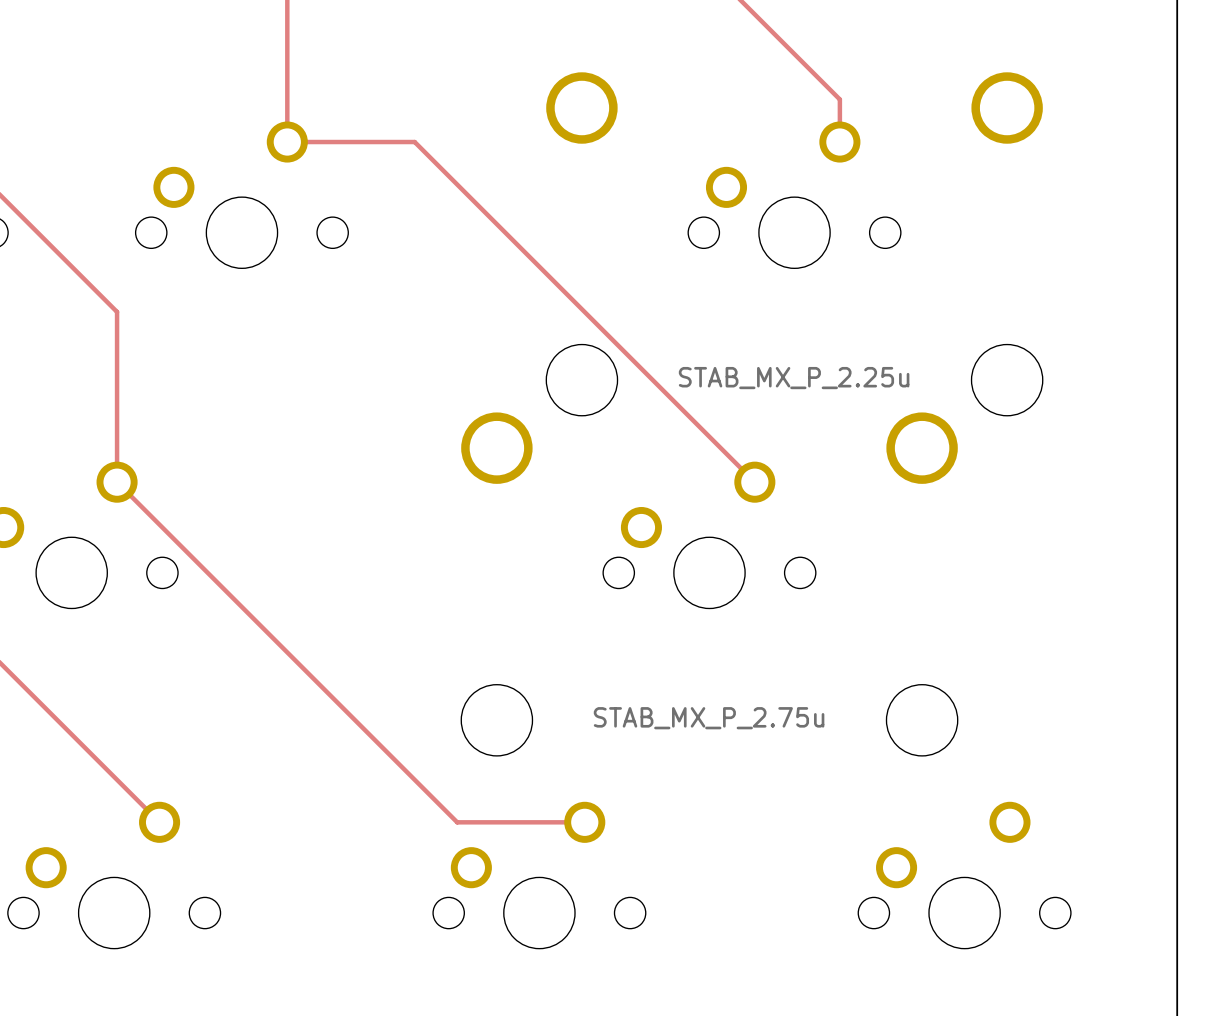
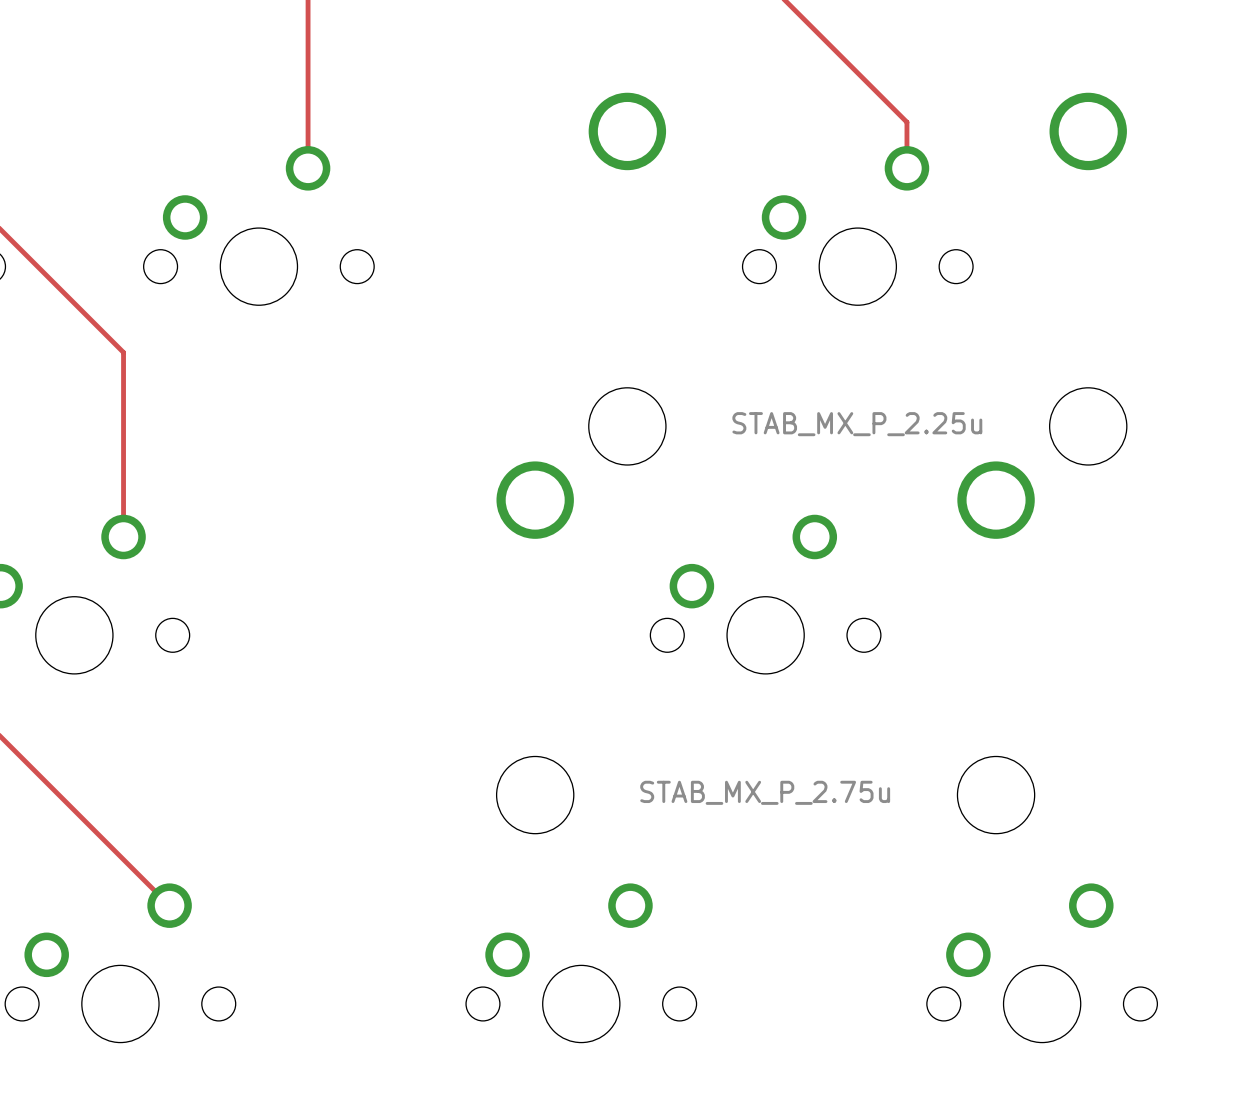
track: (287, 142) (414, 142) (754, 482) -> none
track: (117, 482) (457, 822) (584, 822) -> none

